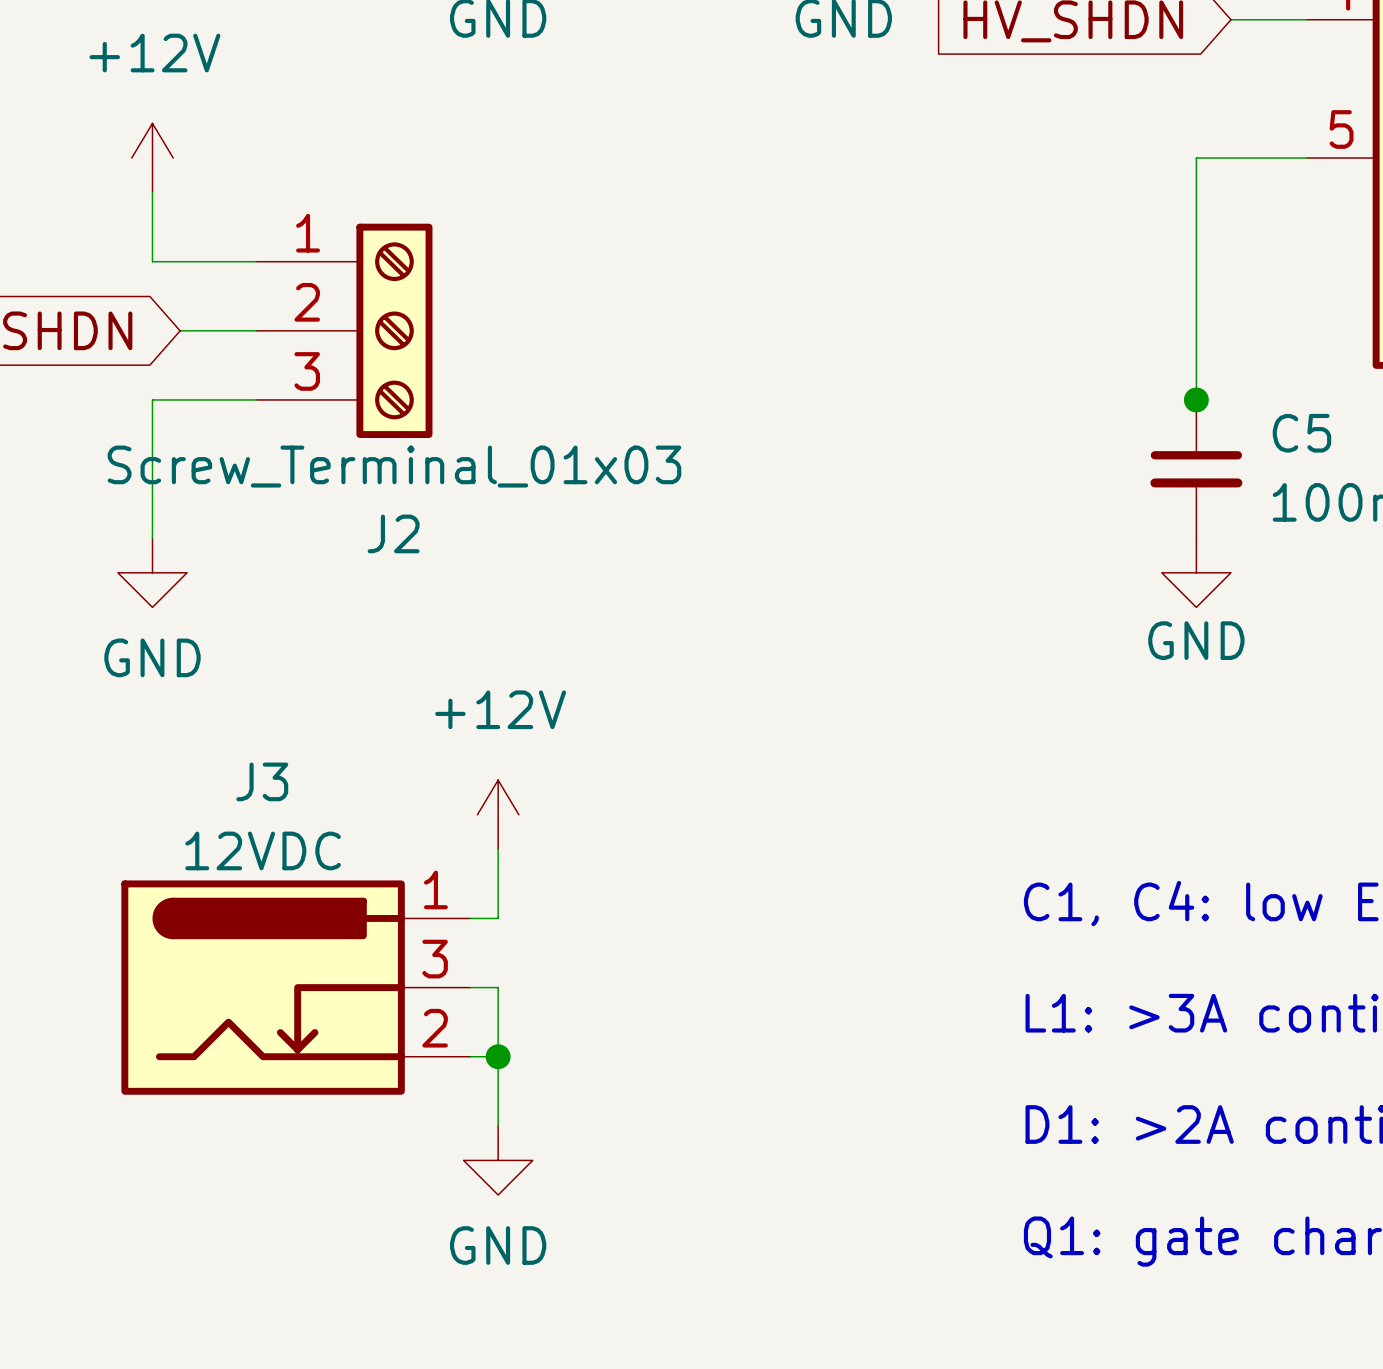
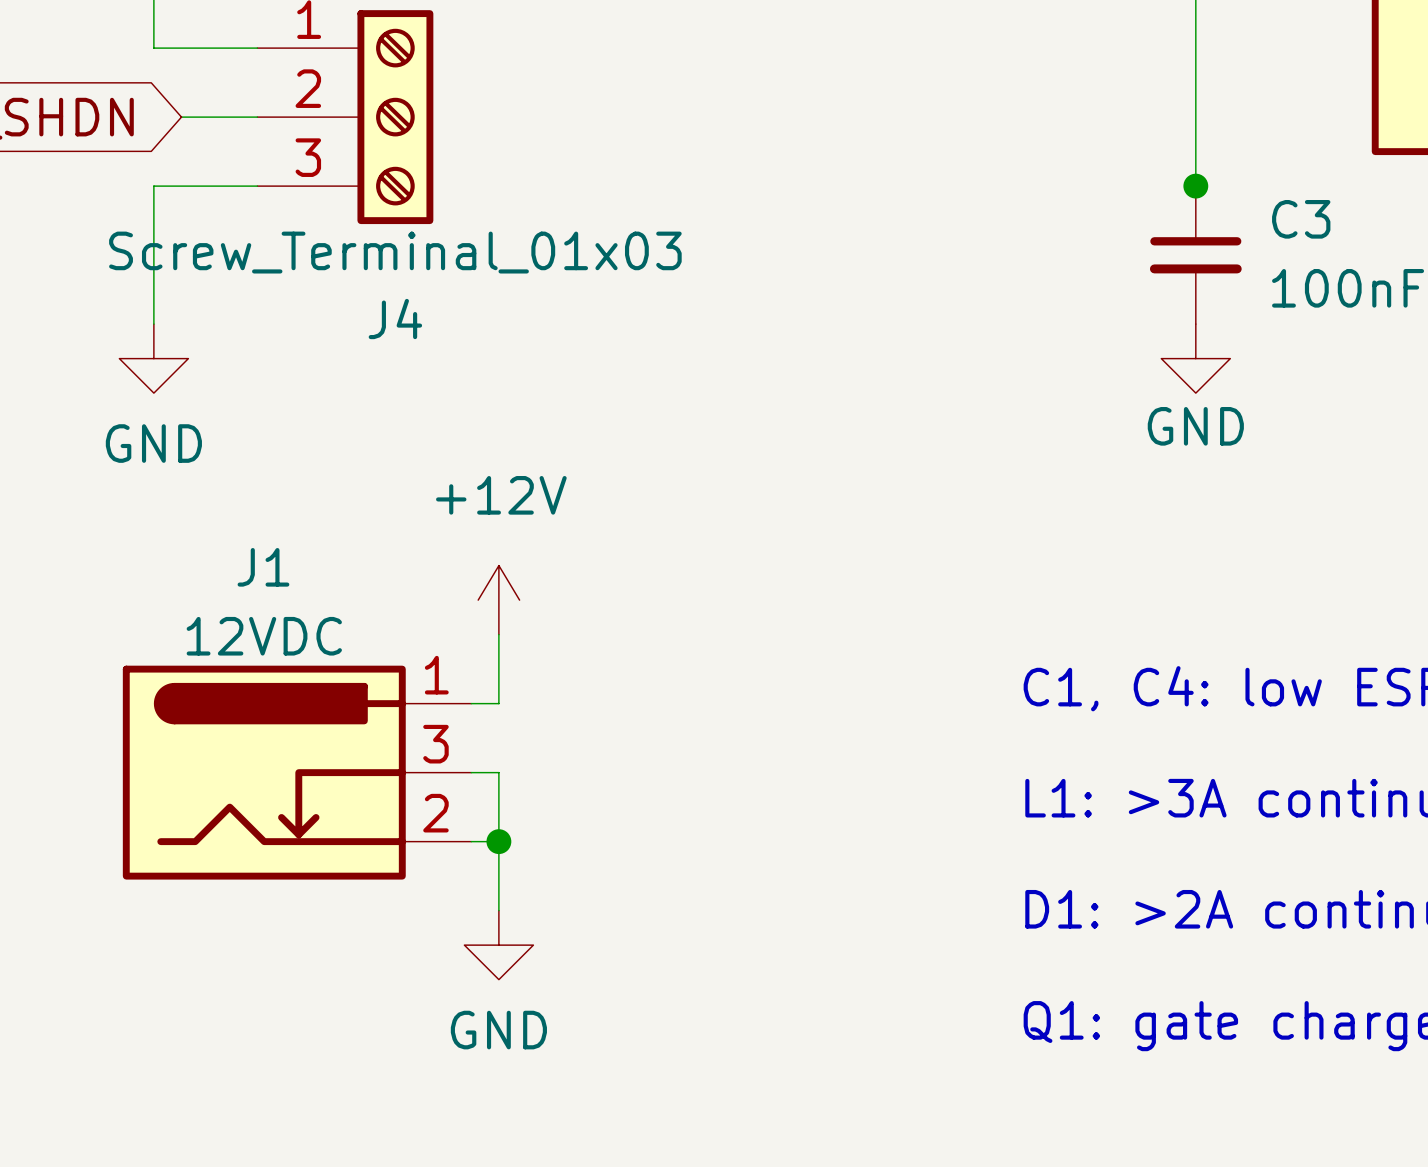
C5 name: C5 (1301, 433) -> C3 (1301, 219)
J2 name: J2 (393, 533) -> J4 (395, 319)
J3 name: J3 (262, 781) -> J1 (263, 567)

